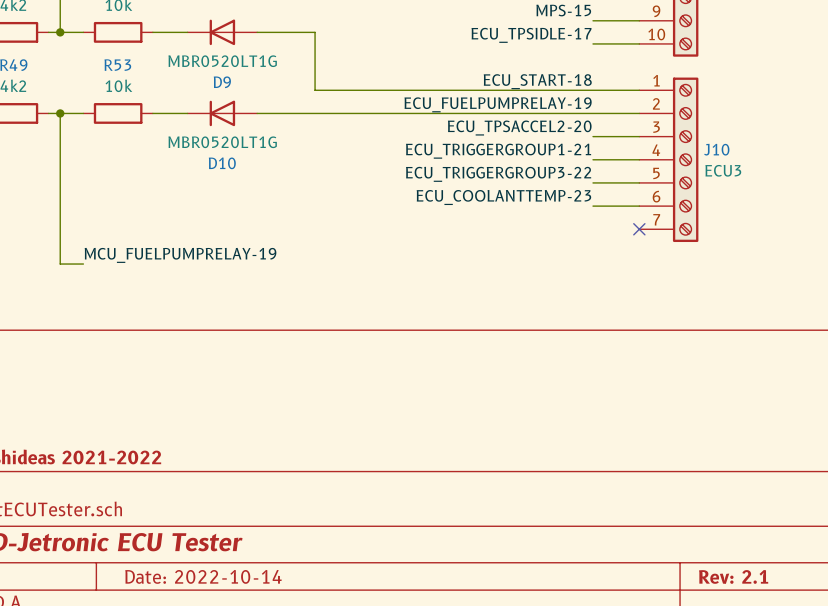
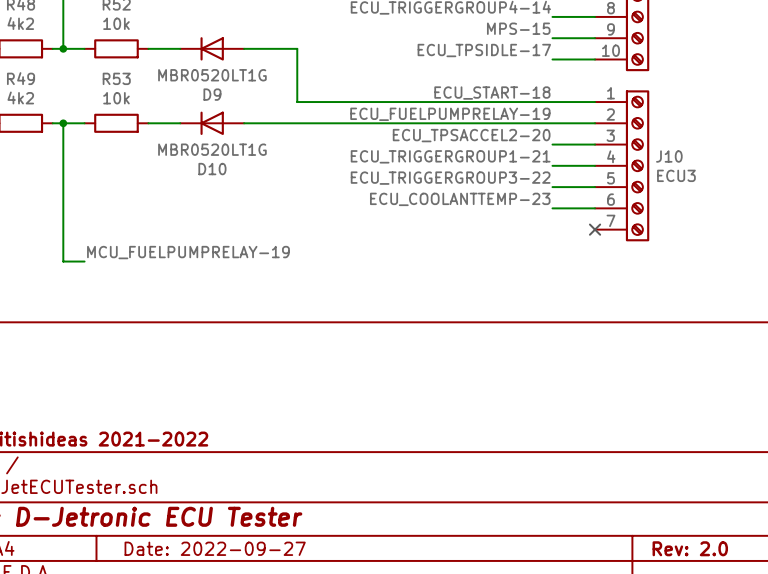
title block: Date: 2022-10-14 (203, 576) -> Date: 2022-09-27 (215, 548)
title block: Rev: 2.1 (733, 576) -> Rev: 2.0 (690, 548)

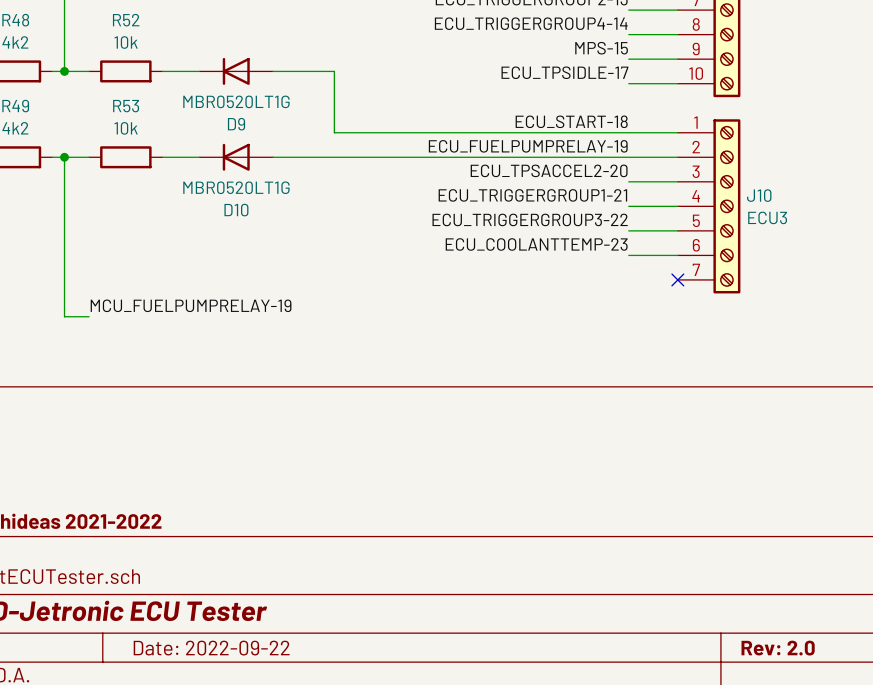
title block: Date: 2022-09-27 (215, 548) -> Date: 2022-09-22 (211, 648)

